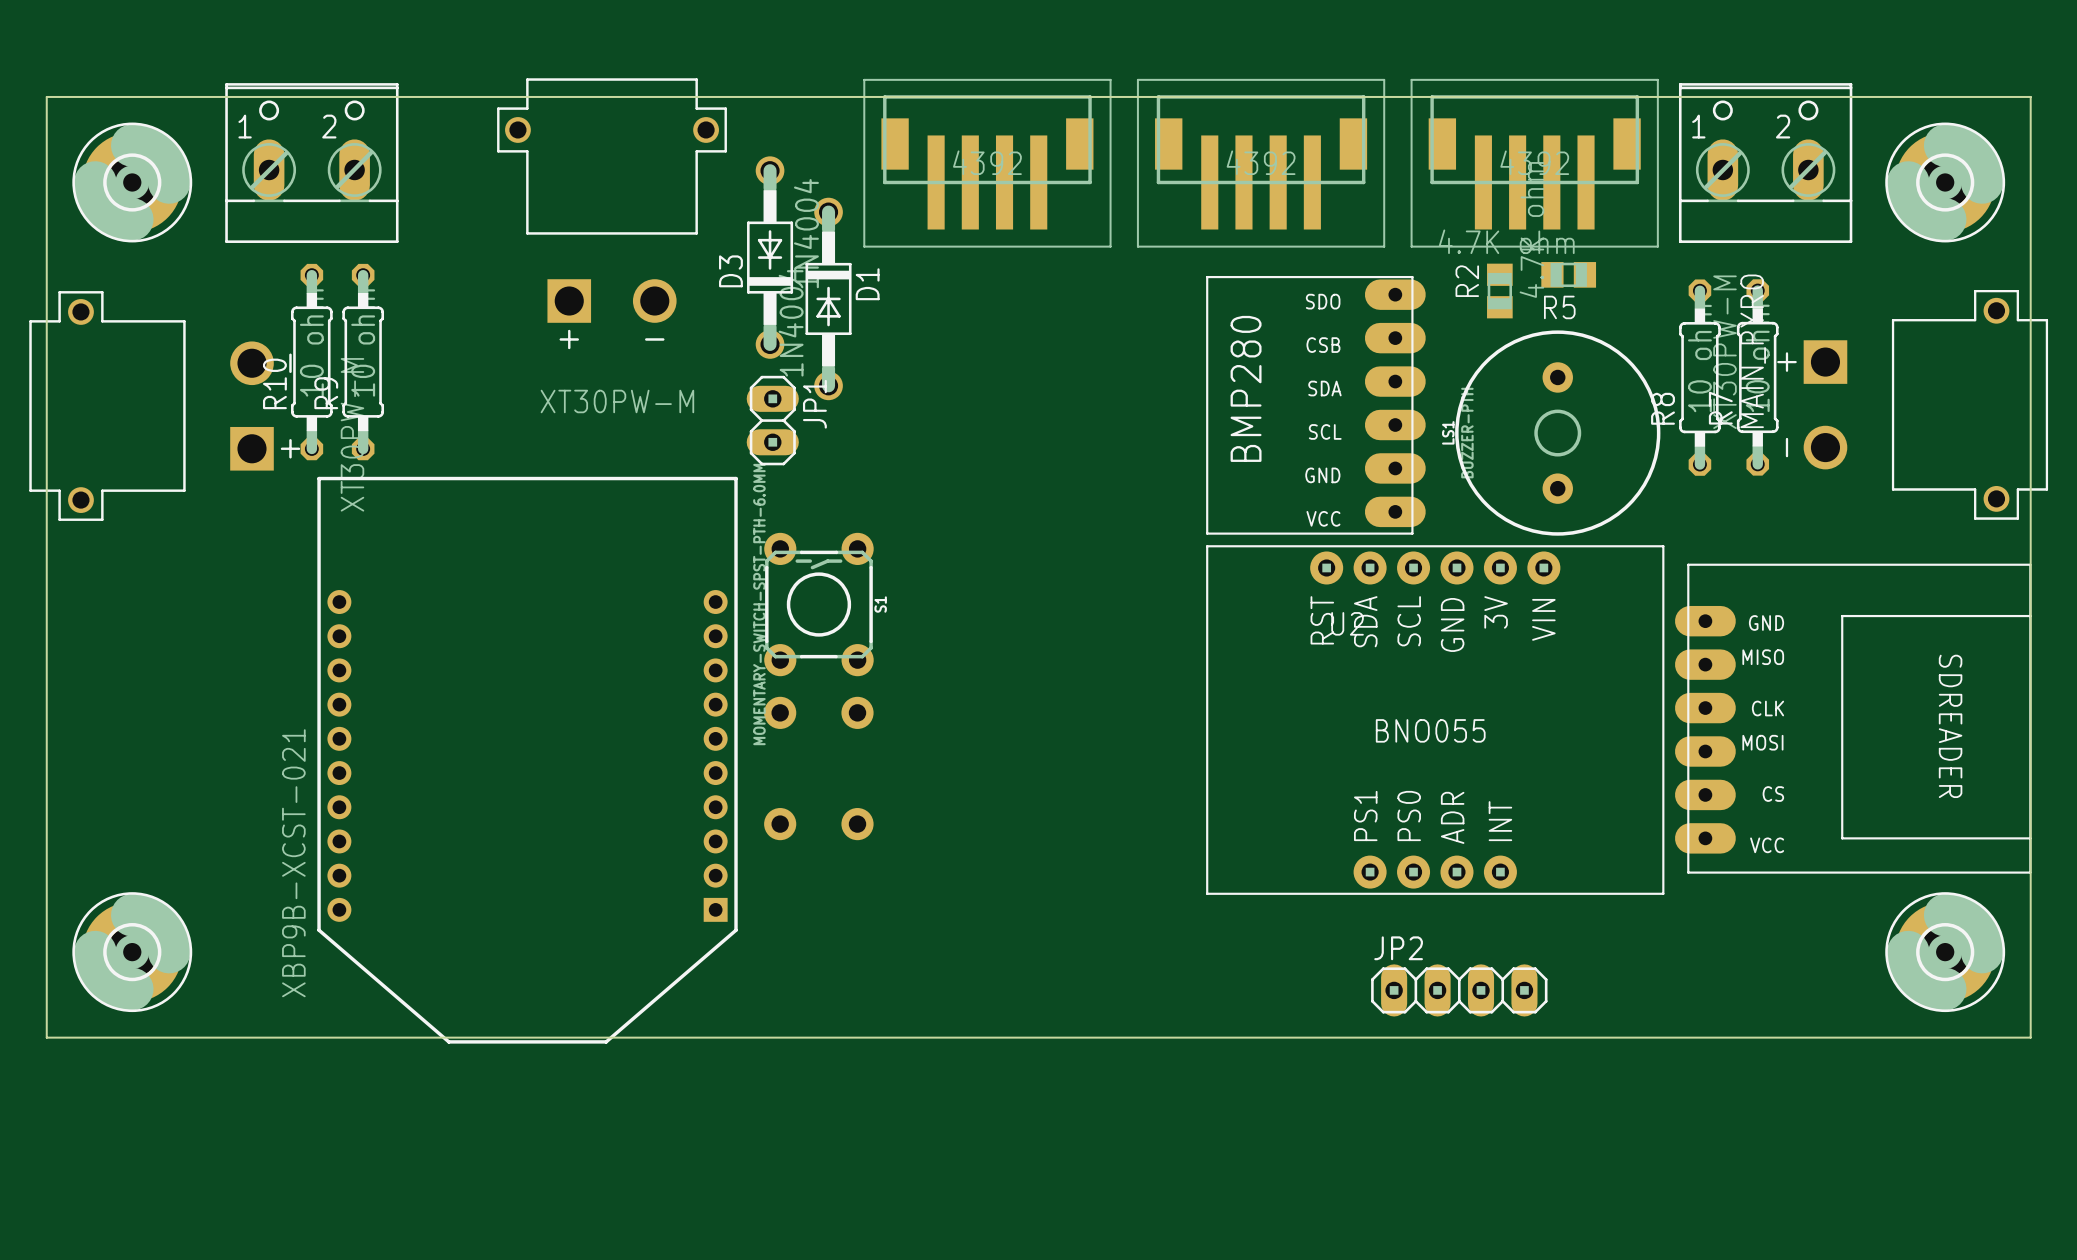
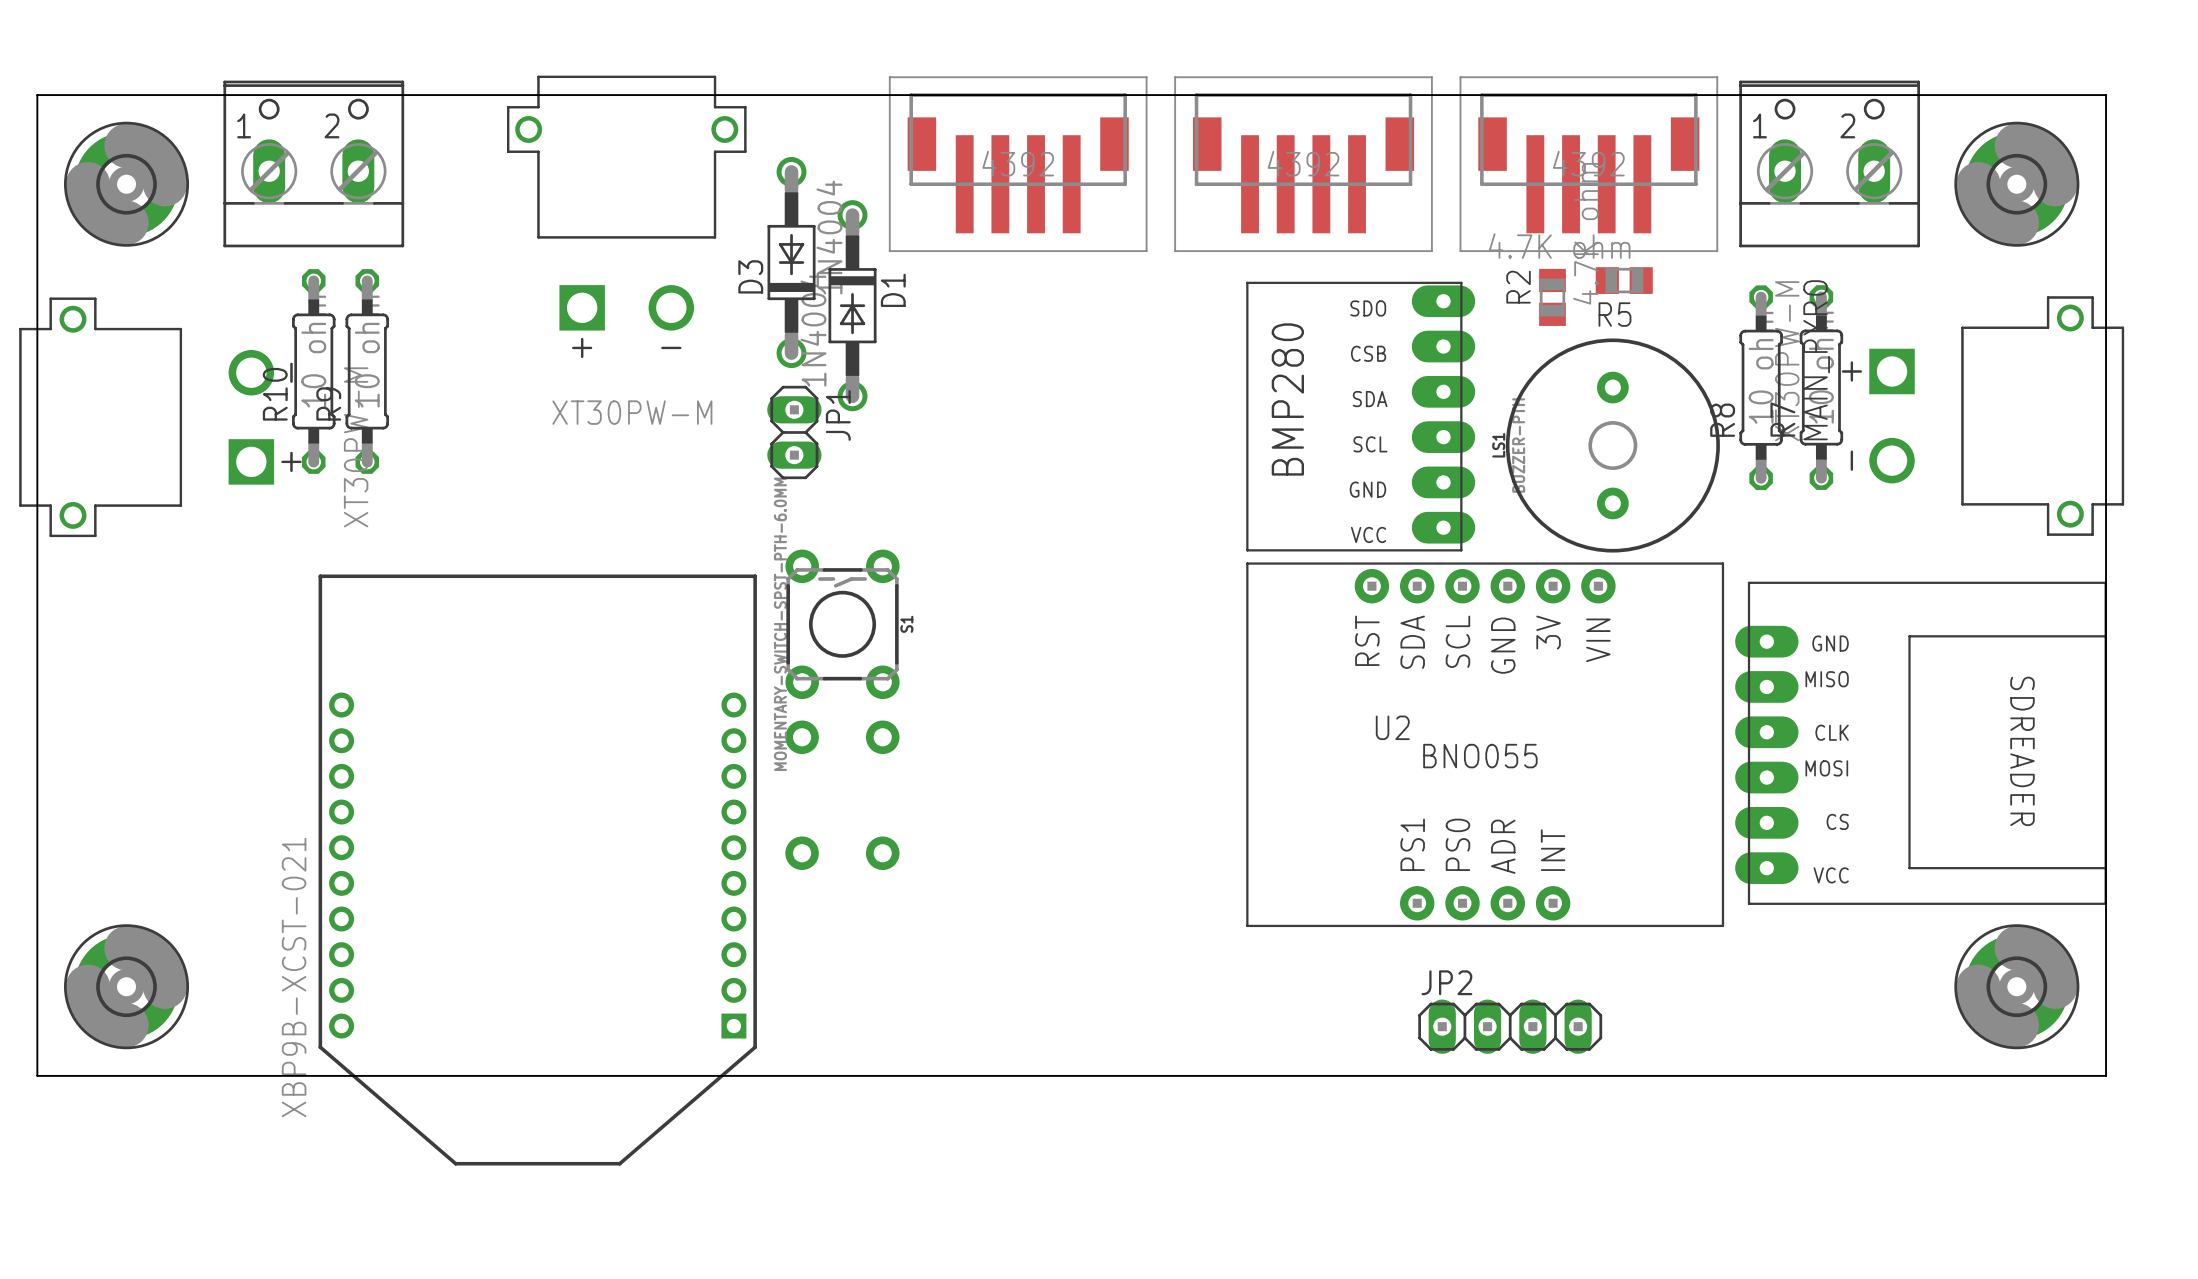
U2 position: (527, 760) -> (537, 870)

